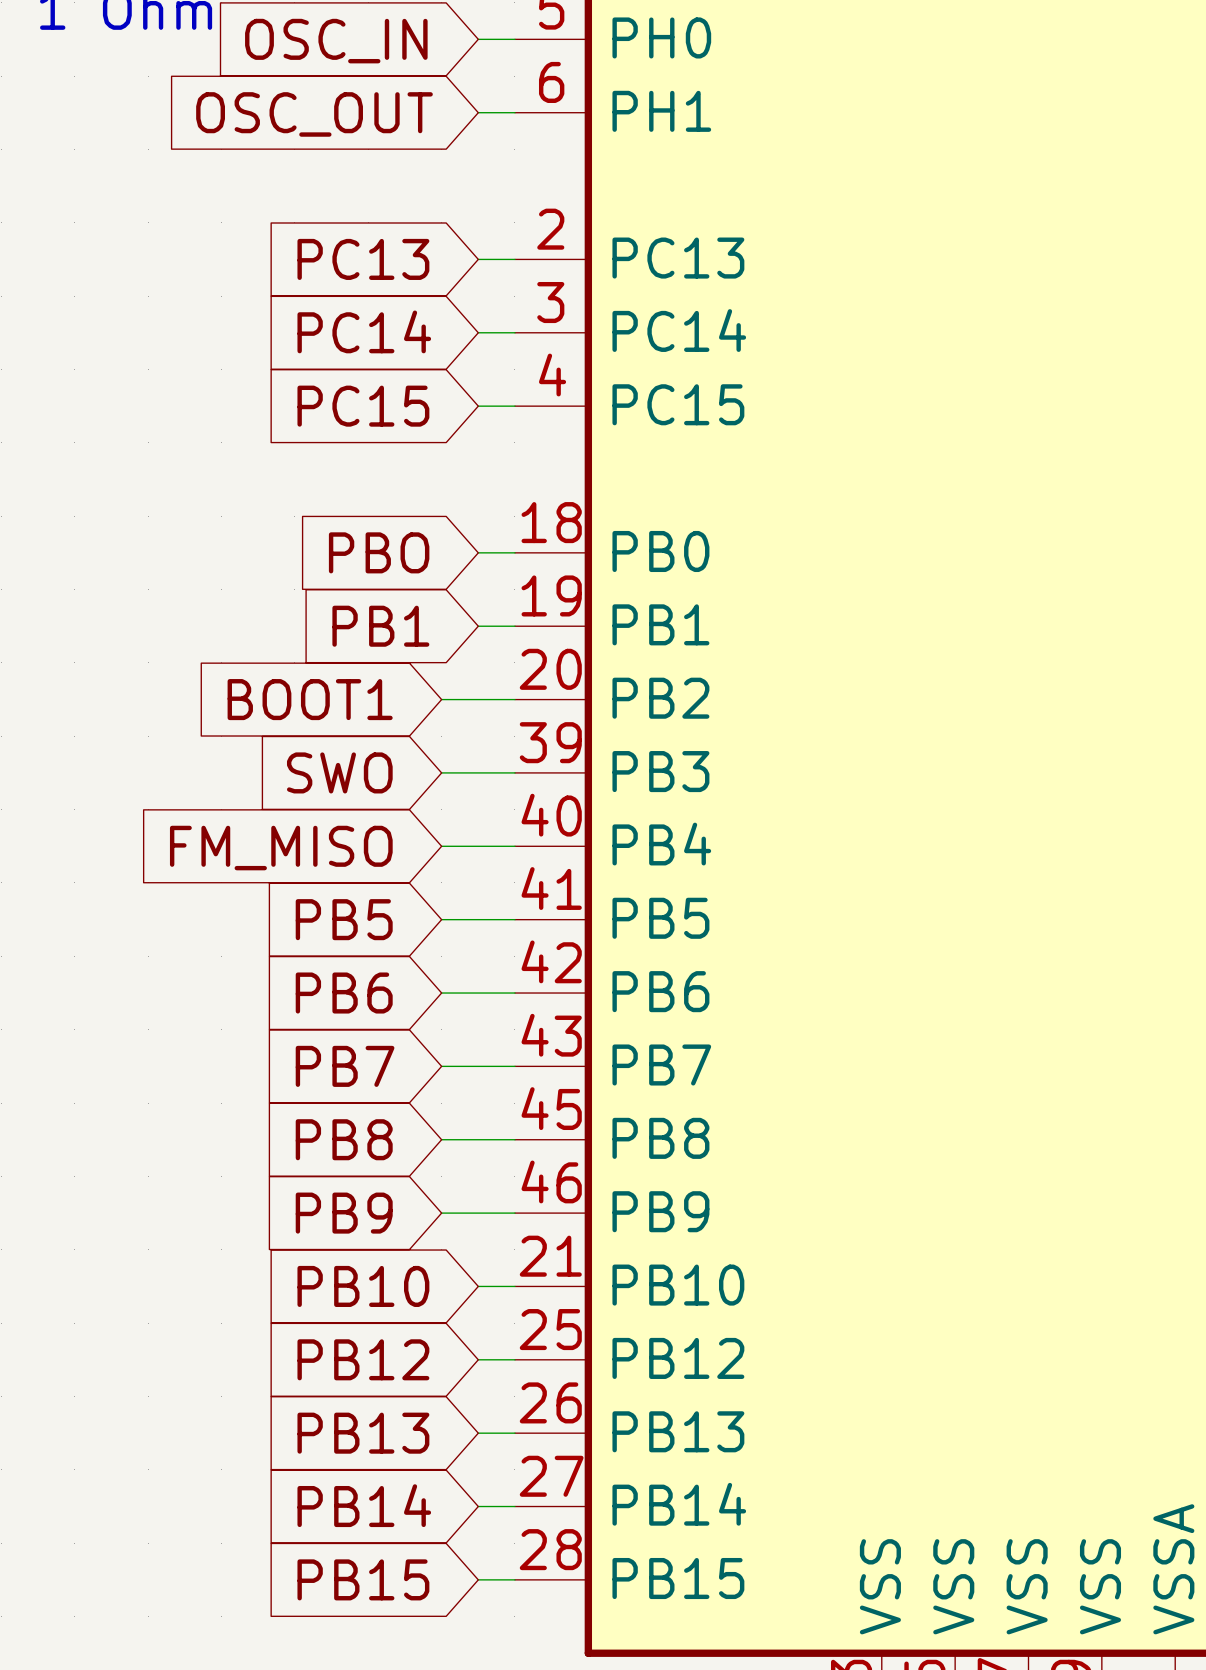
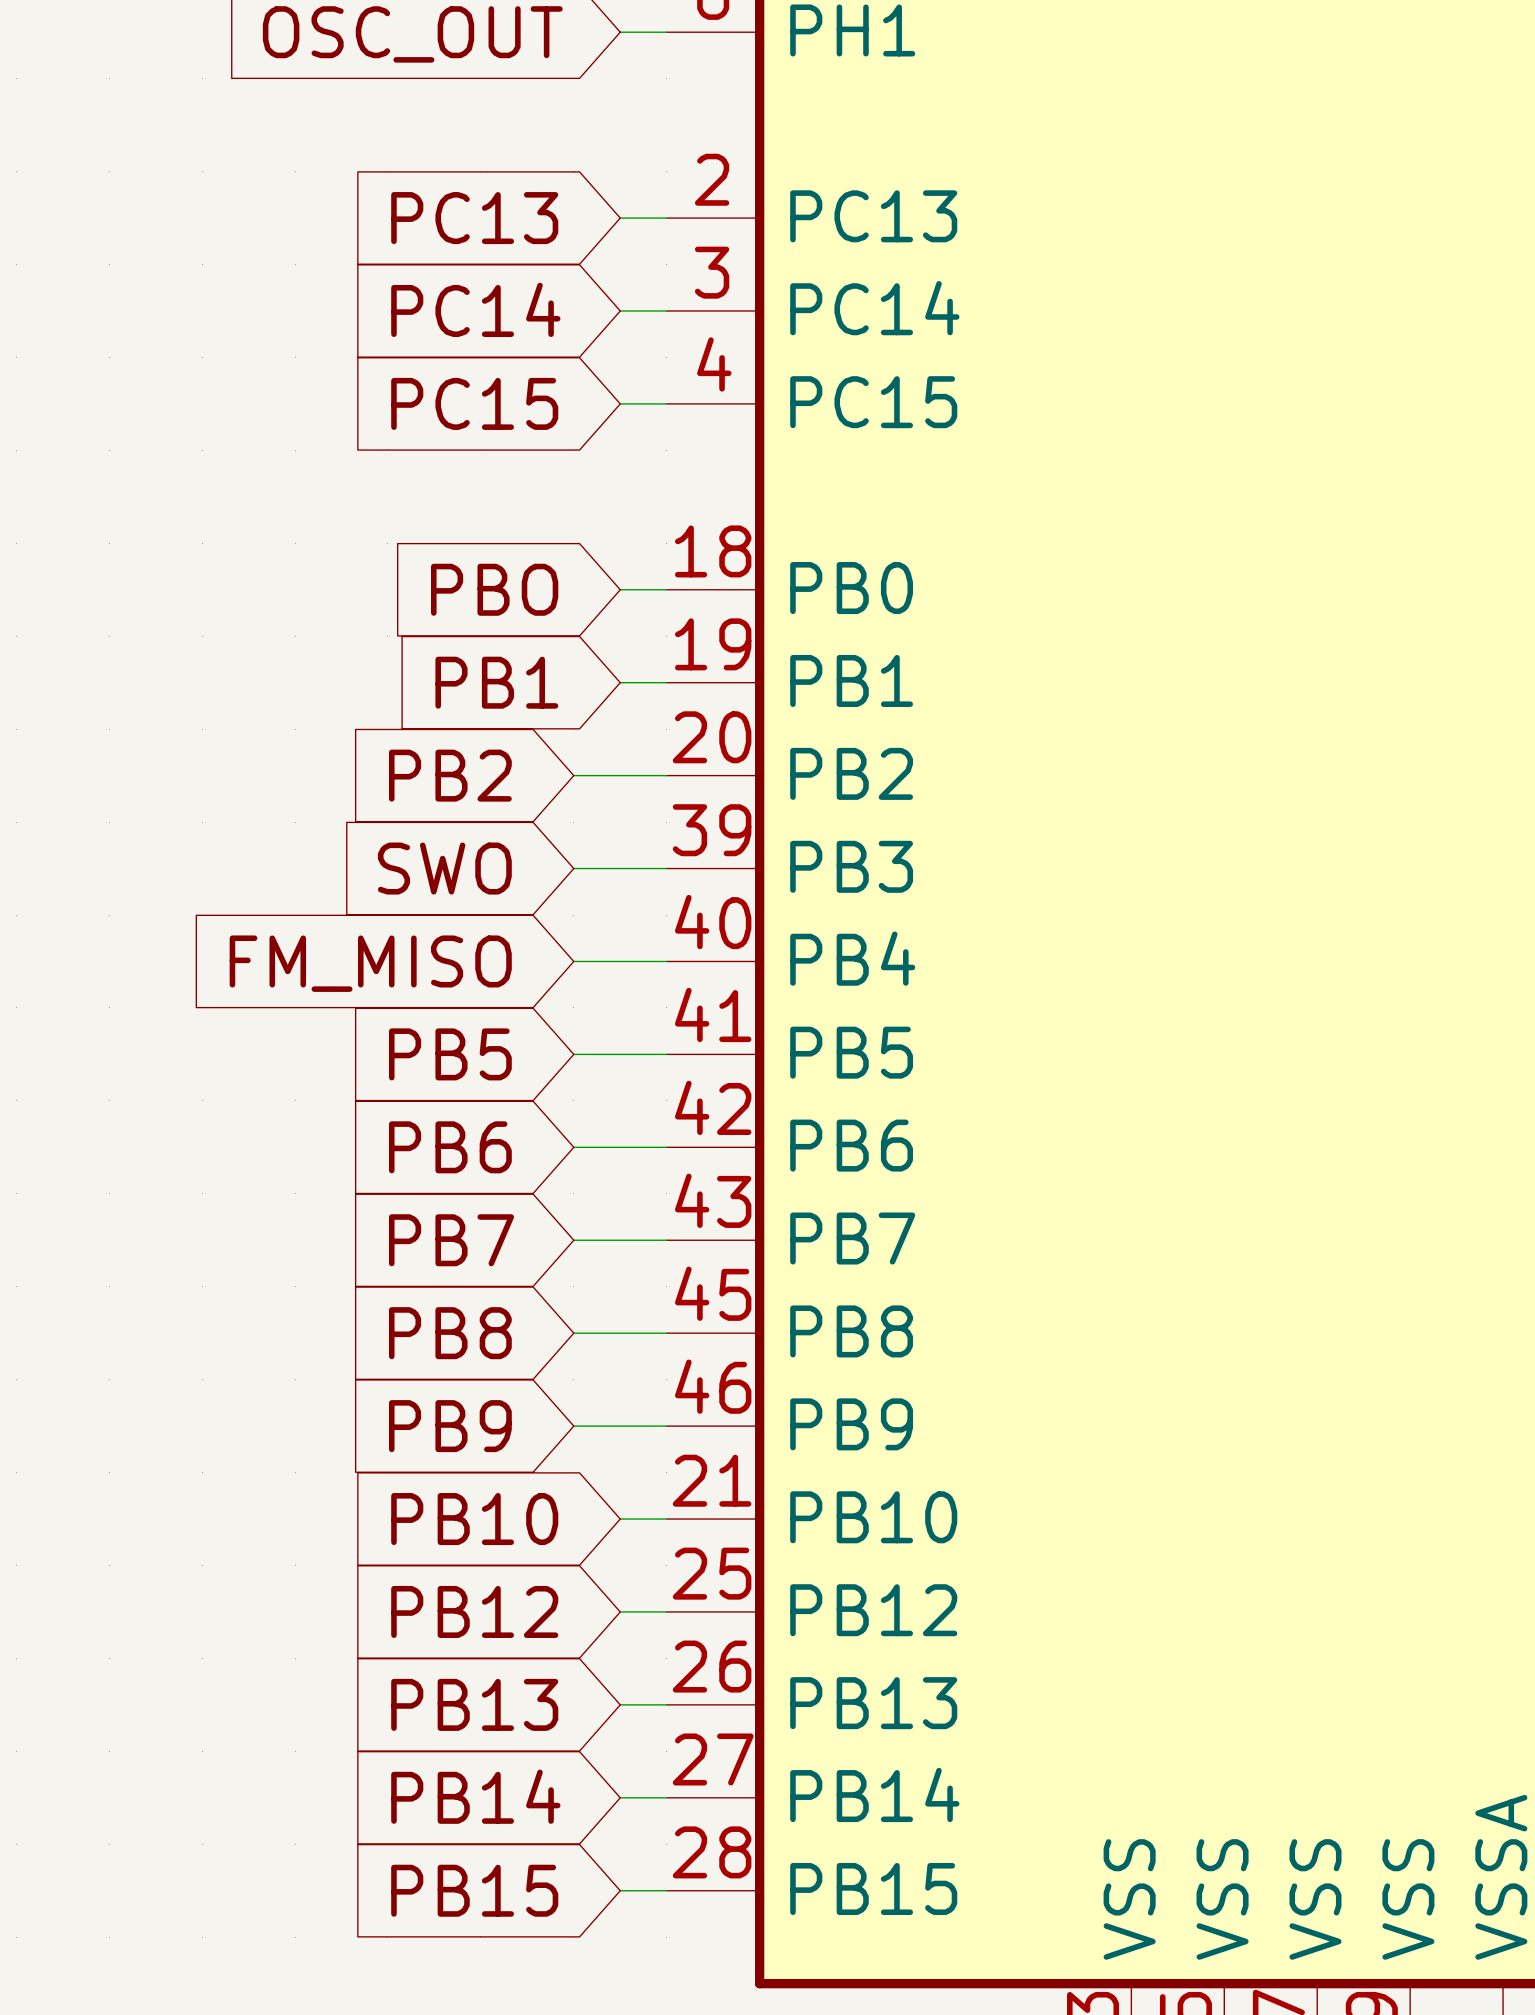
global label: BOOT1 (310, 699) -> PB2 (450, 775)

